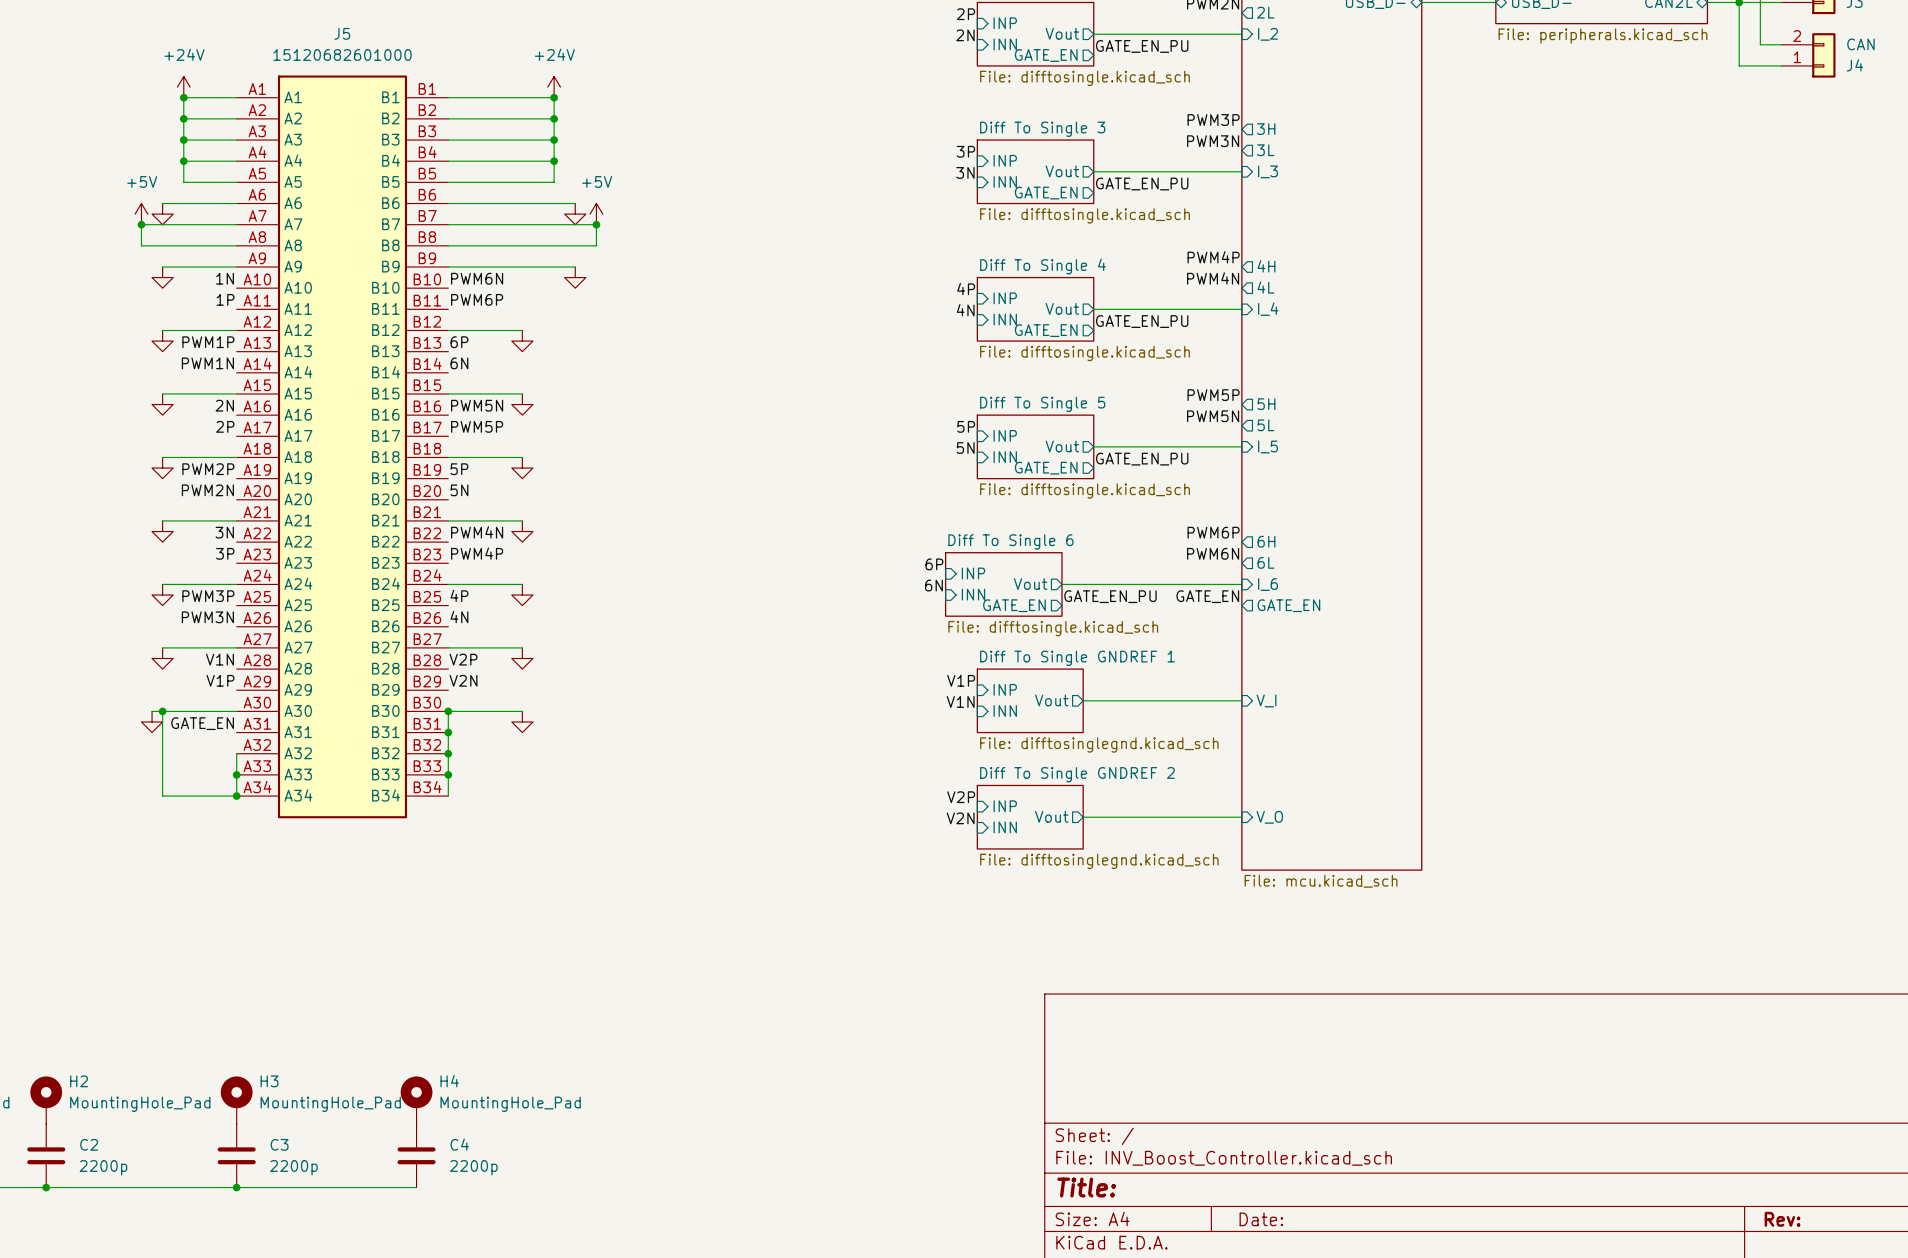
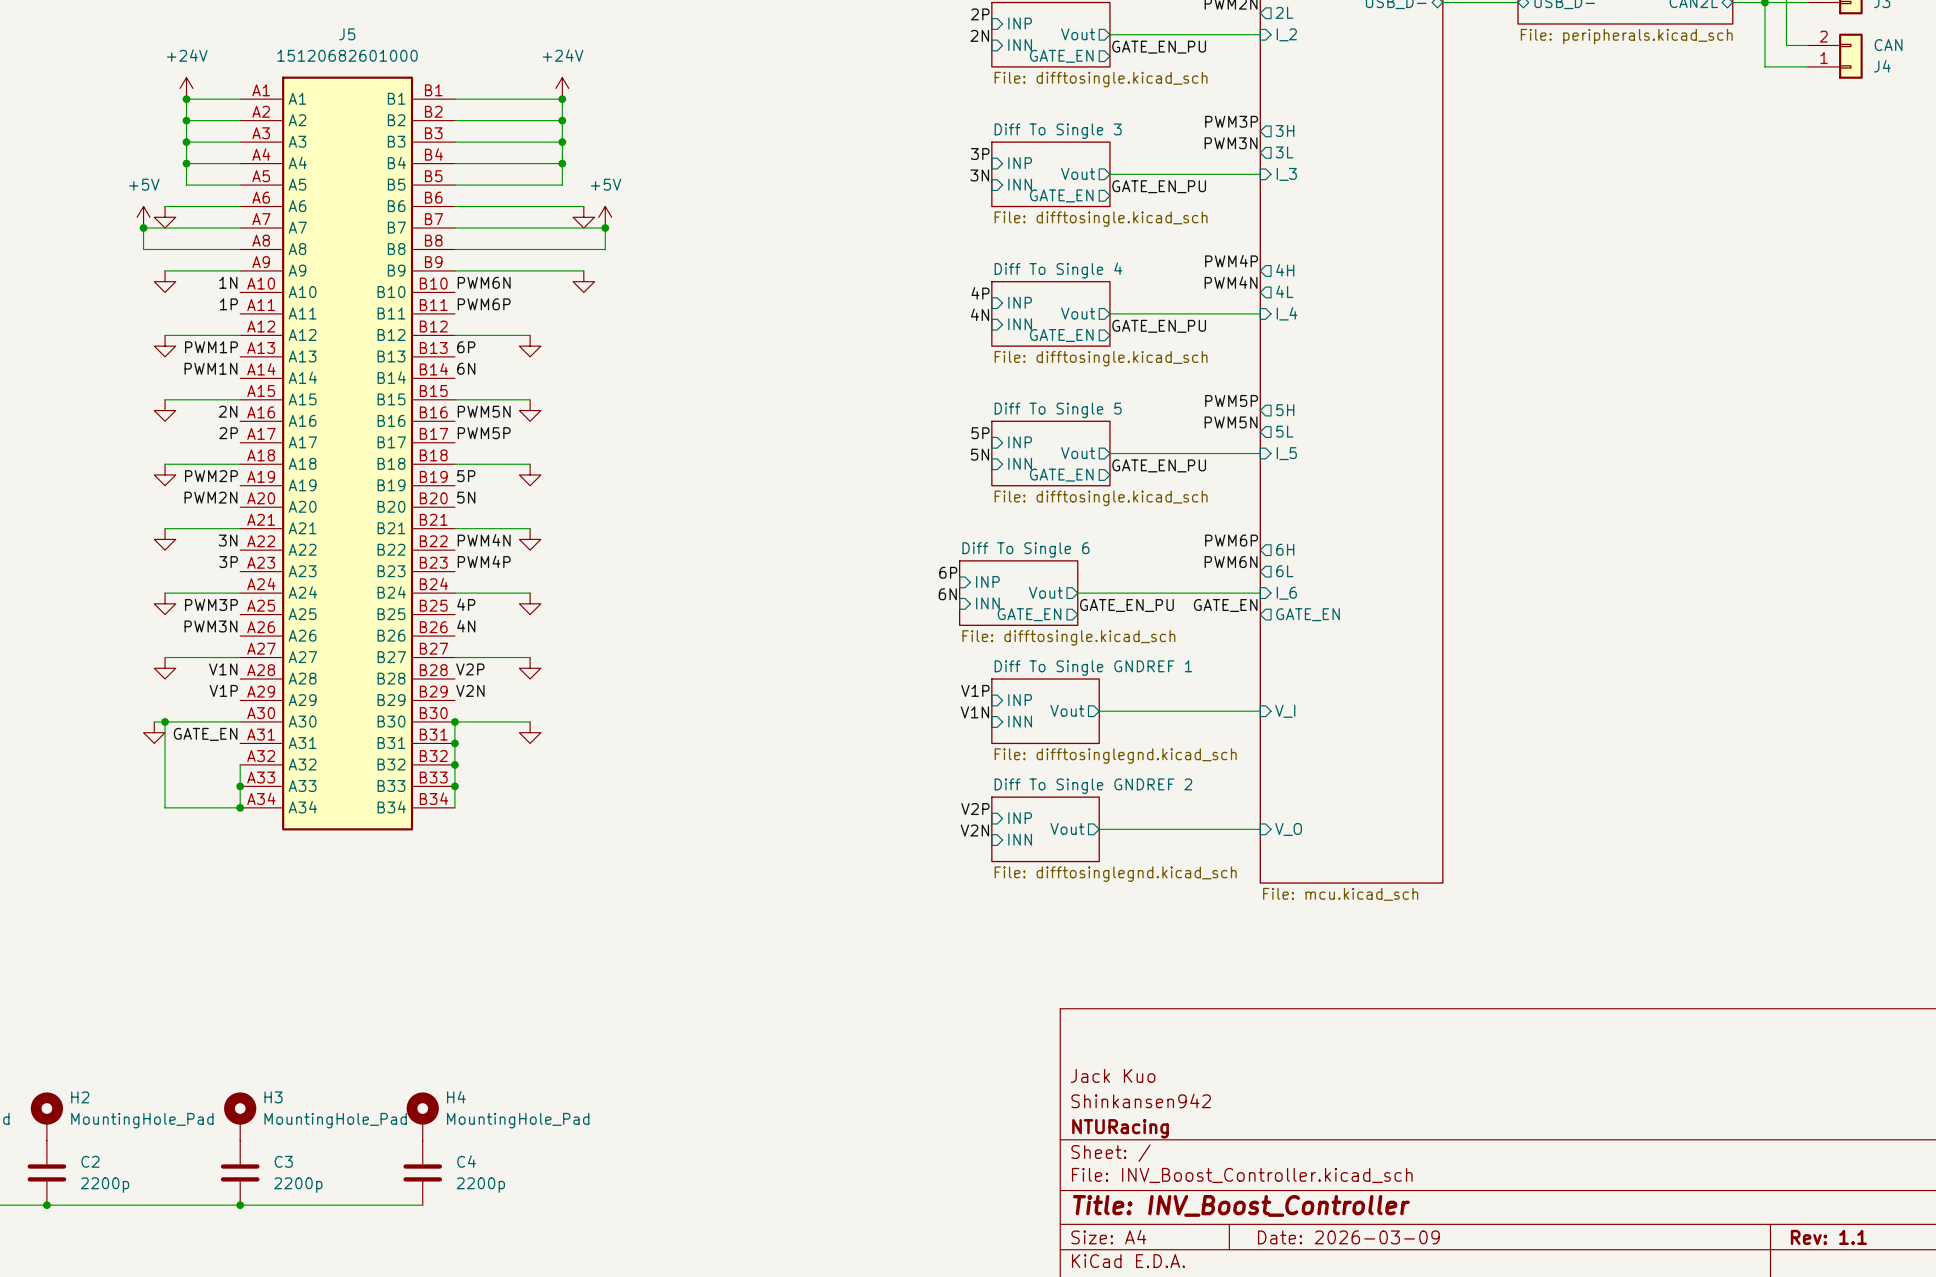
title block: none -> Jack Kuo (1113, 1075)
title block: none -> Shinkansen942 (1141, 1100)
title block: none -> NTURacing (1120, 1128)
title block: Title: (1086, 1187) -> Title: INV_Boost_Controller (1241, 1205)
title block: Date: (1261, 1219) -> Date: 2026-03-09 (1348, 1237)
title block: Rev: (1782, 1219) -> Rev: 1.1 (1828, 1237)

